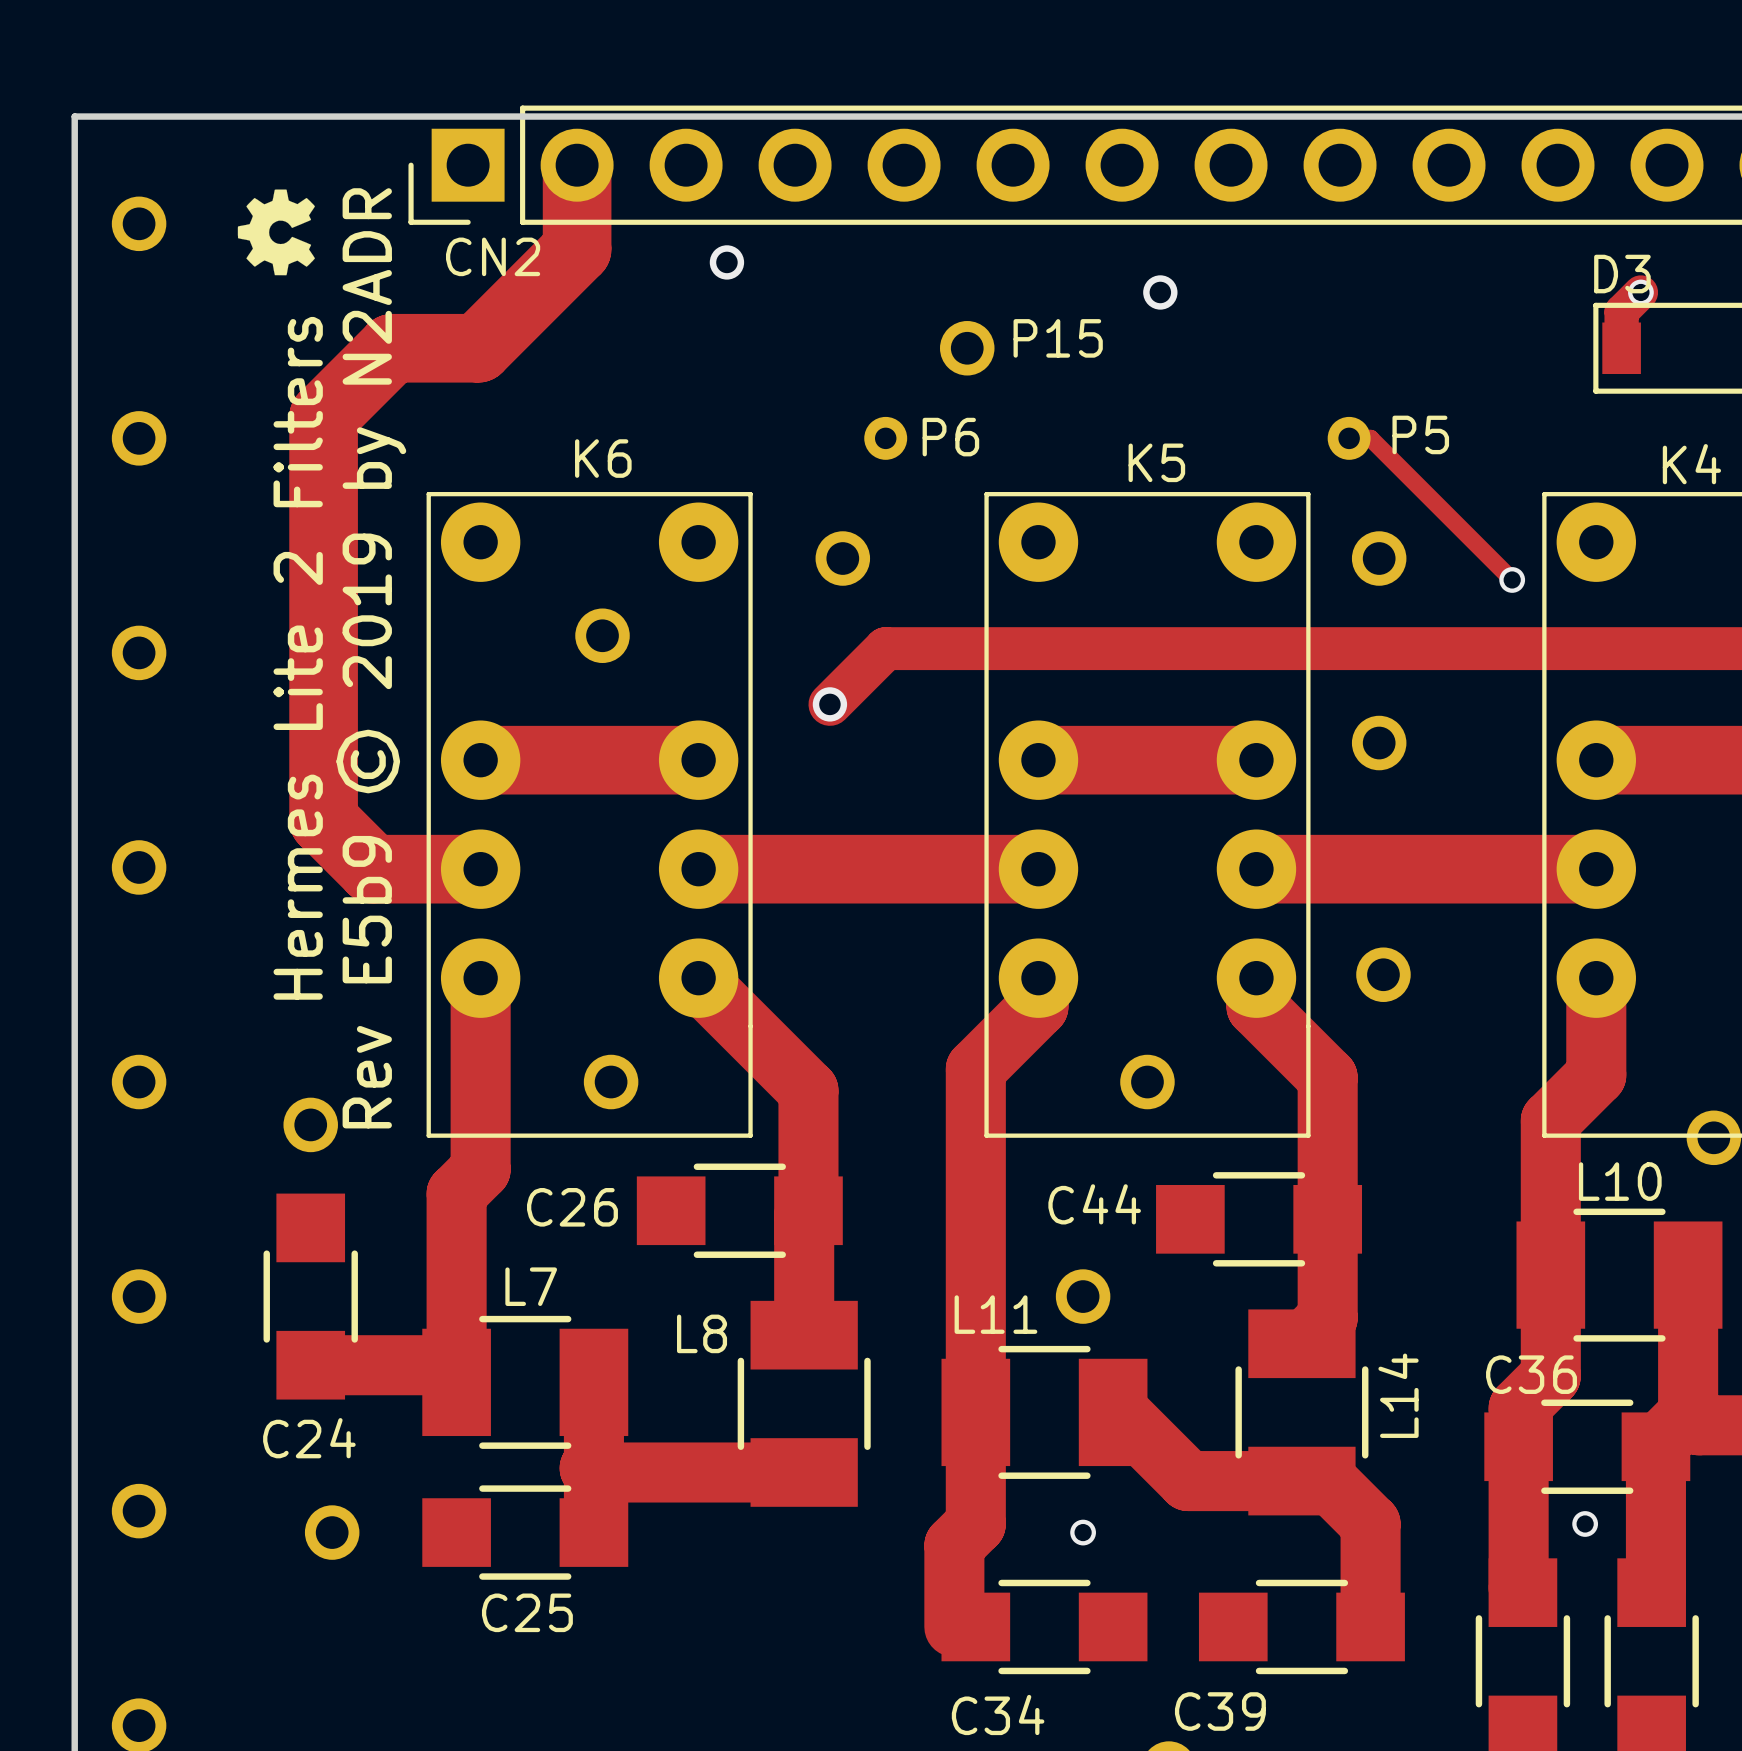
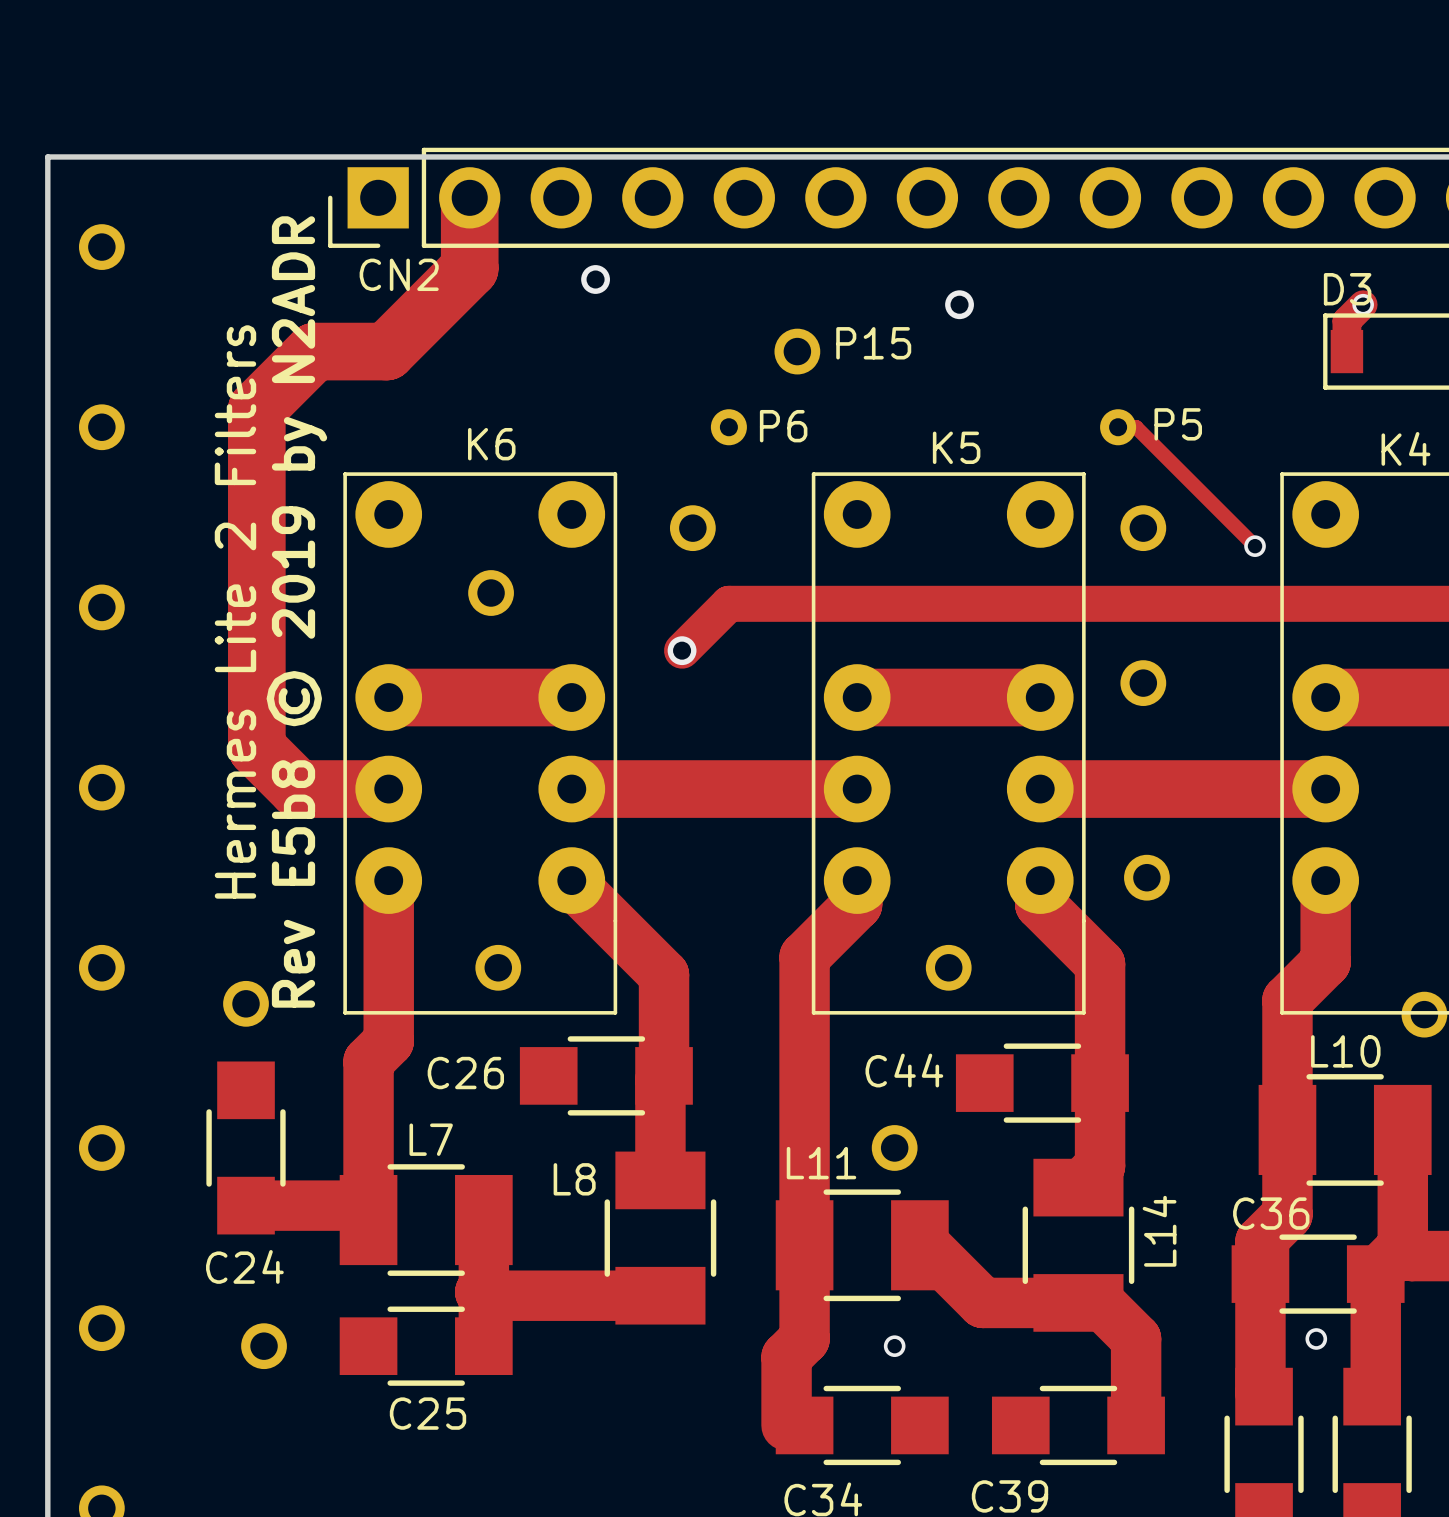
drawing: [237, 189, 315, 276] -> none
text: Rev E5b9 © 2019 by N2ADR (371, 658) -> Rev E5b8 © 2019 by N2ADR (296, 611)

